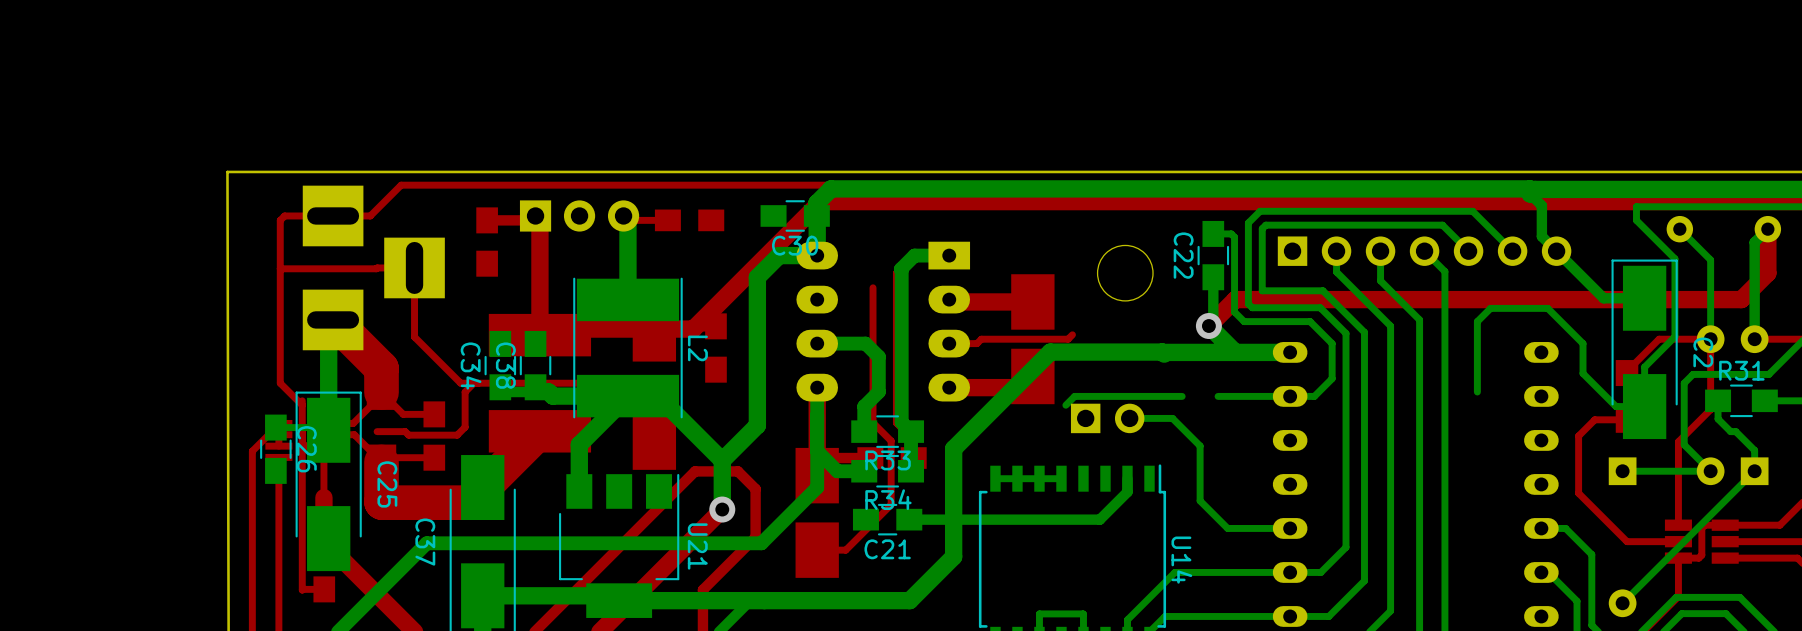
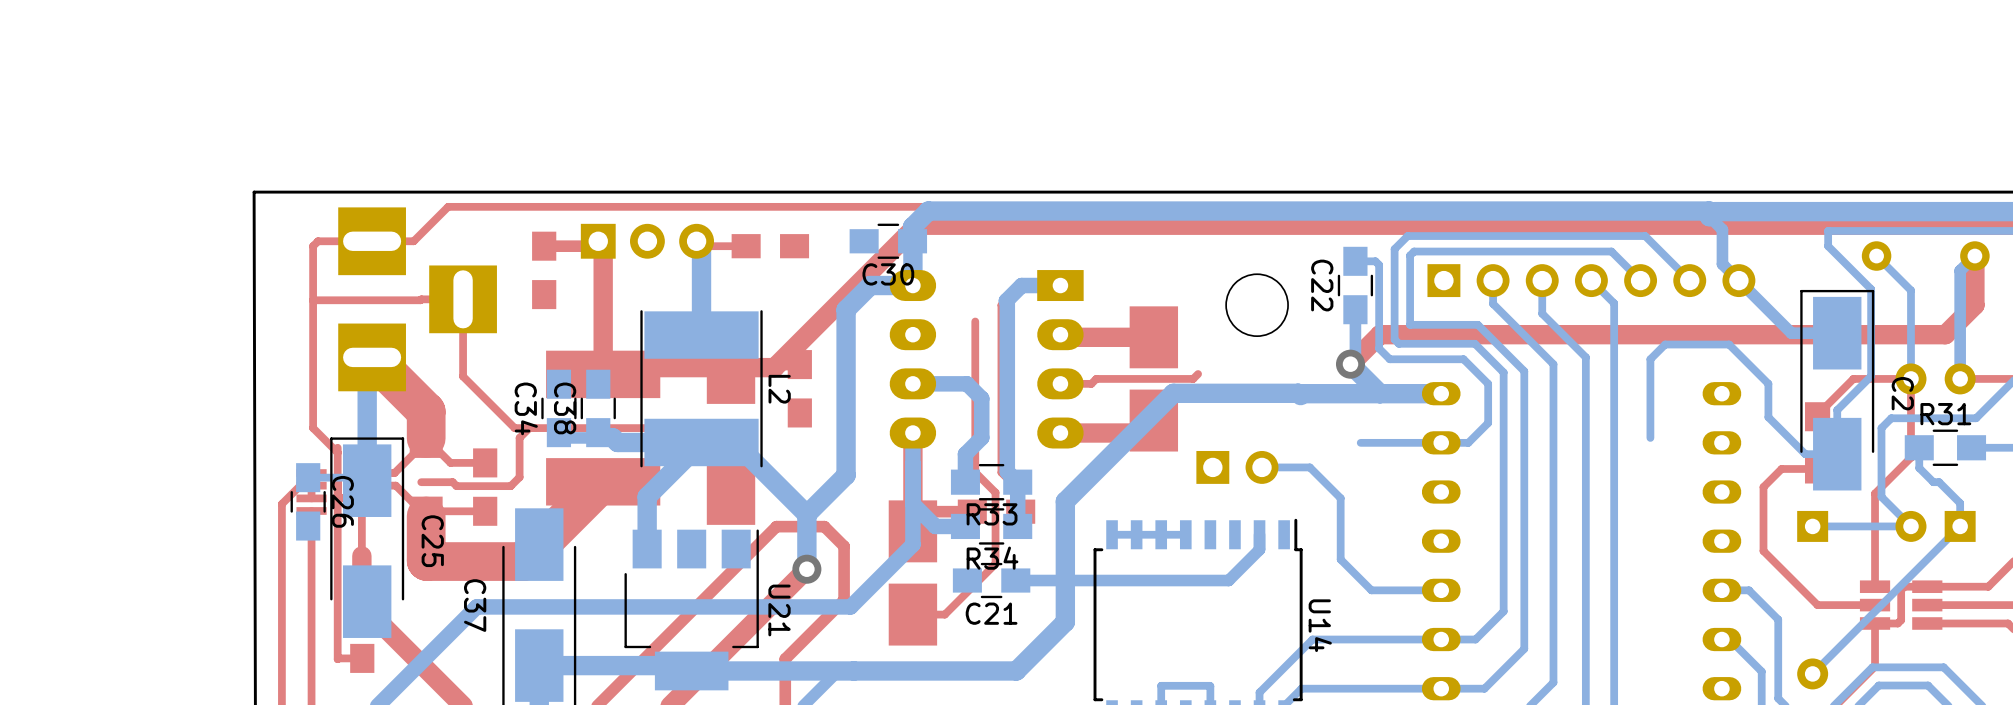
bottom track: (1182, 396) (1074, 396) (1065, 405) -> none

